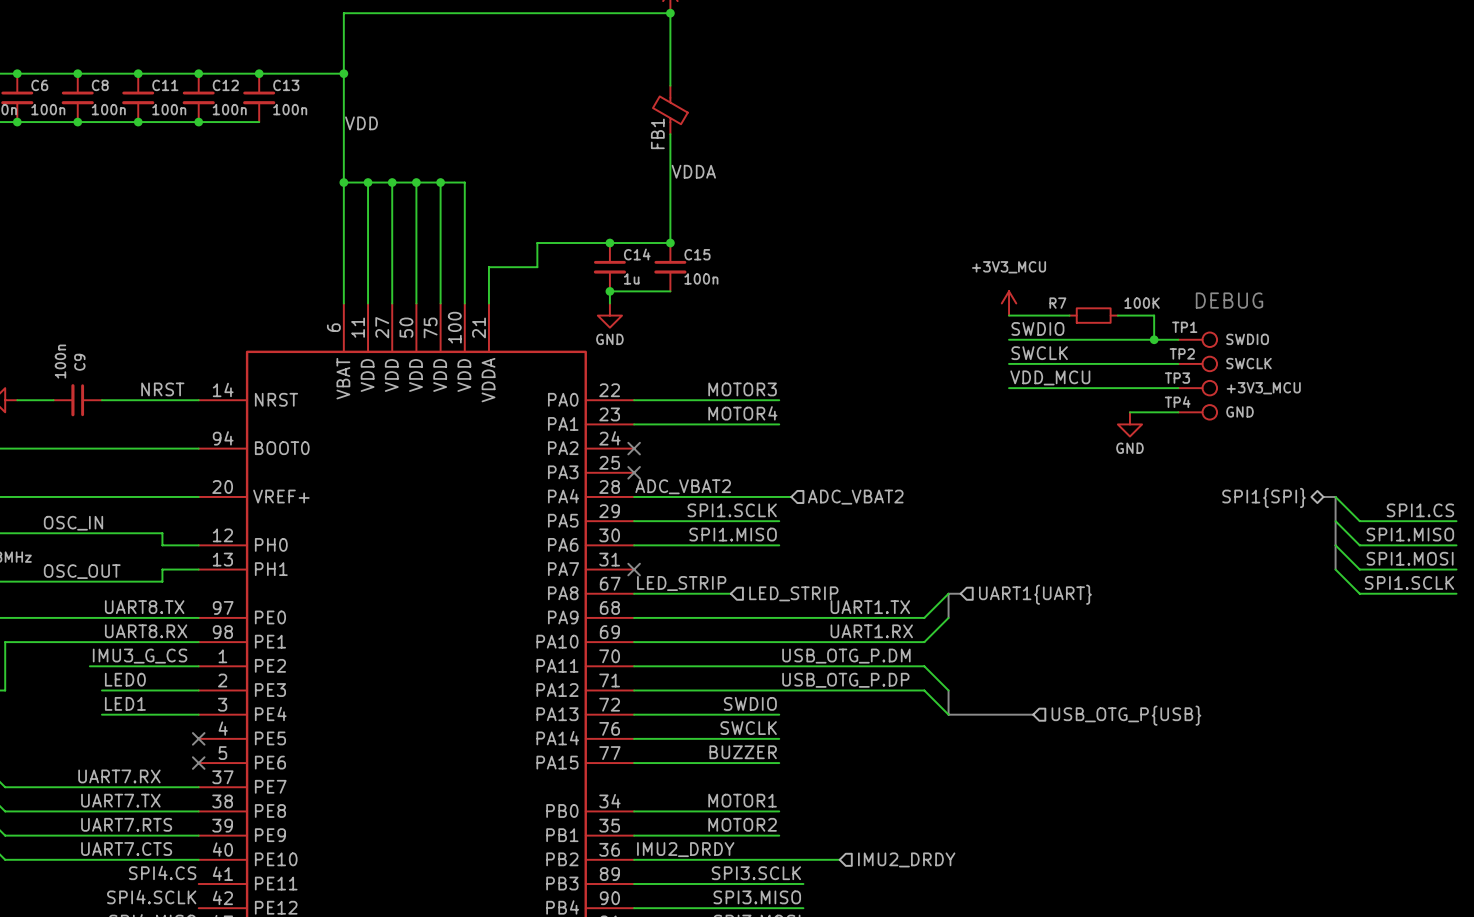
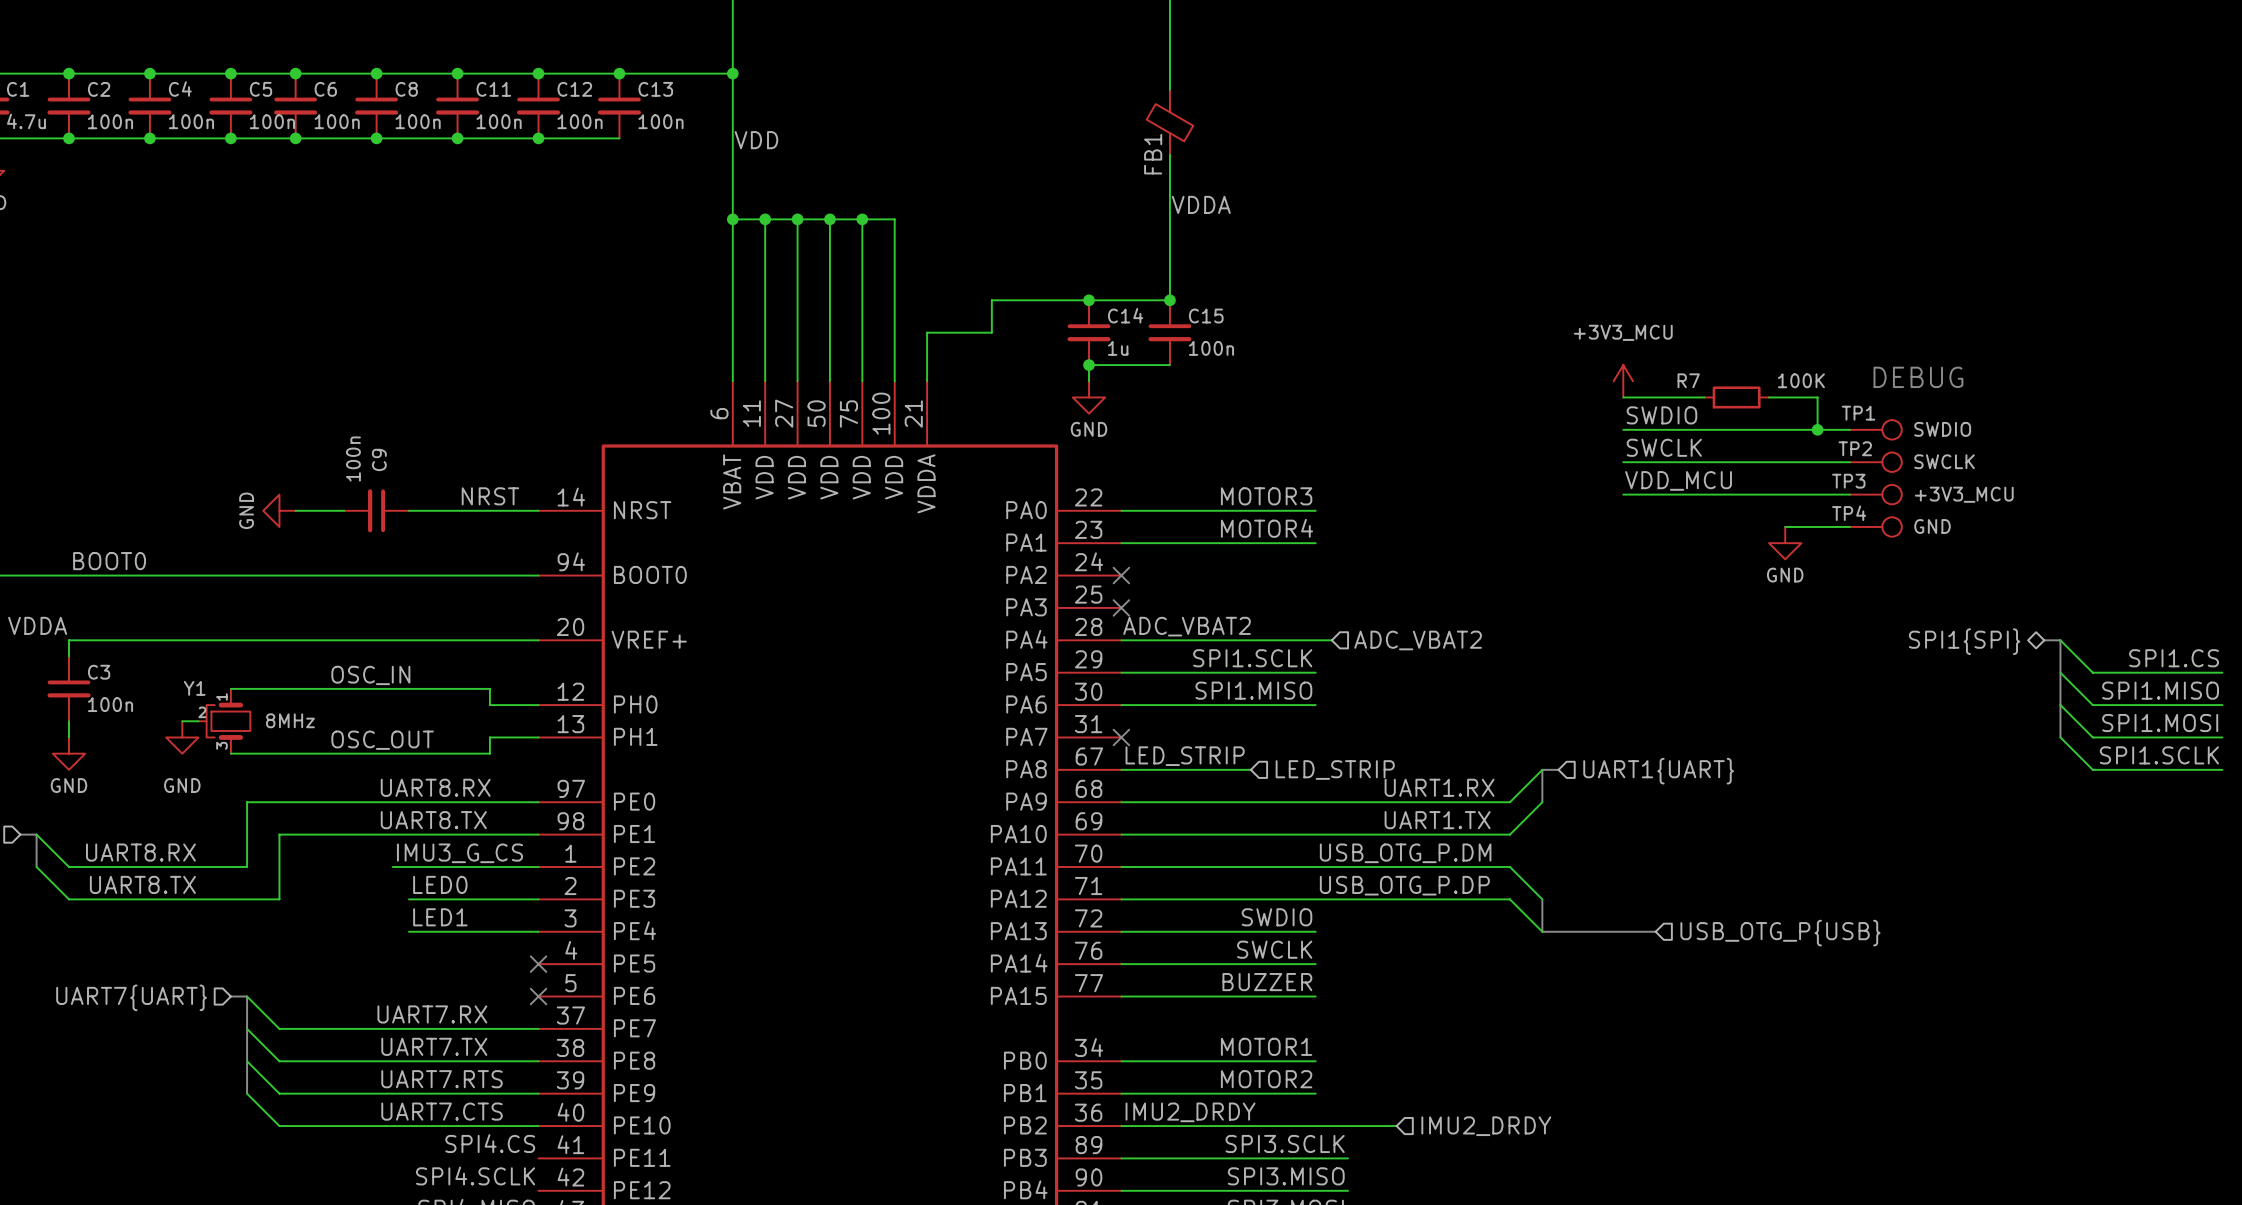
label position: UART8.TX (144, 607) -> UART8.TX (433, 820)
label: UART1.TX (870, 607) -> UART1.RX (1439, 787)
label position: UART8.RX (146, 631) -> UART8.RX (435, 787)
label: UART1.RX (871, 631) -> UART1.TX (1437, 820)

